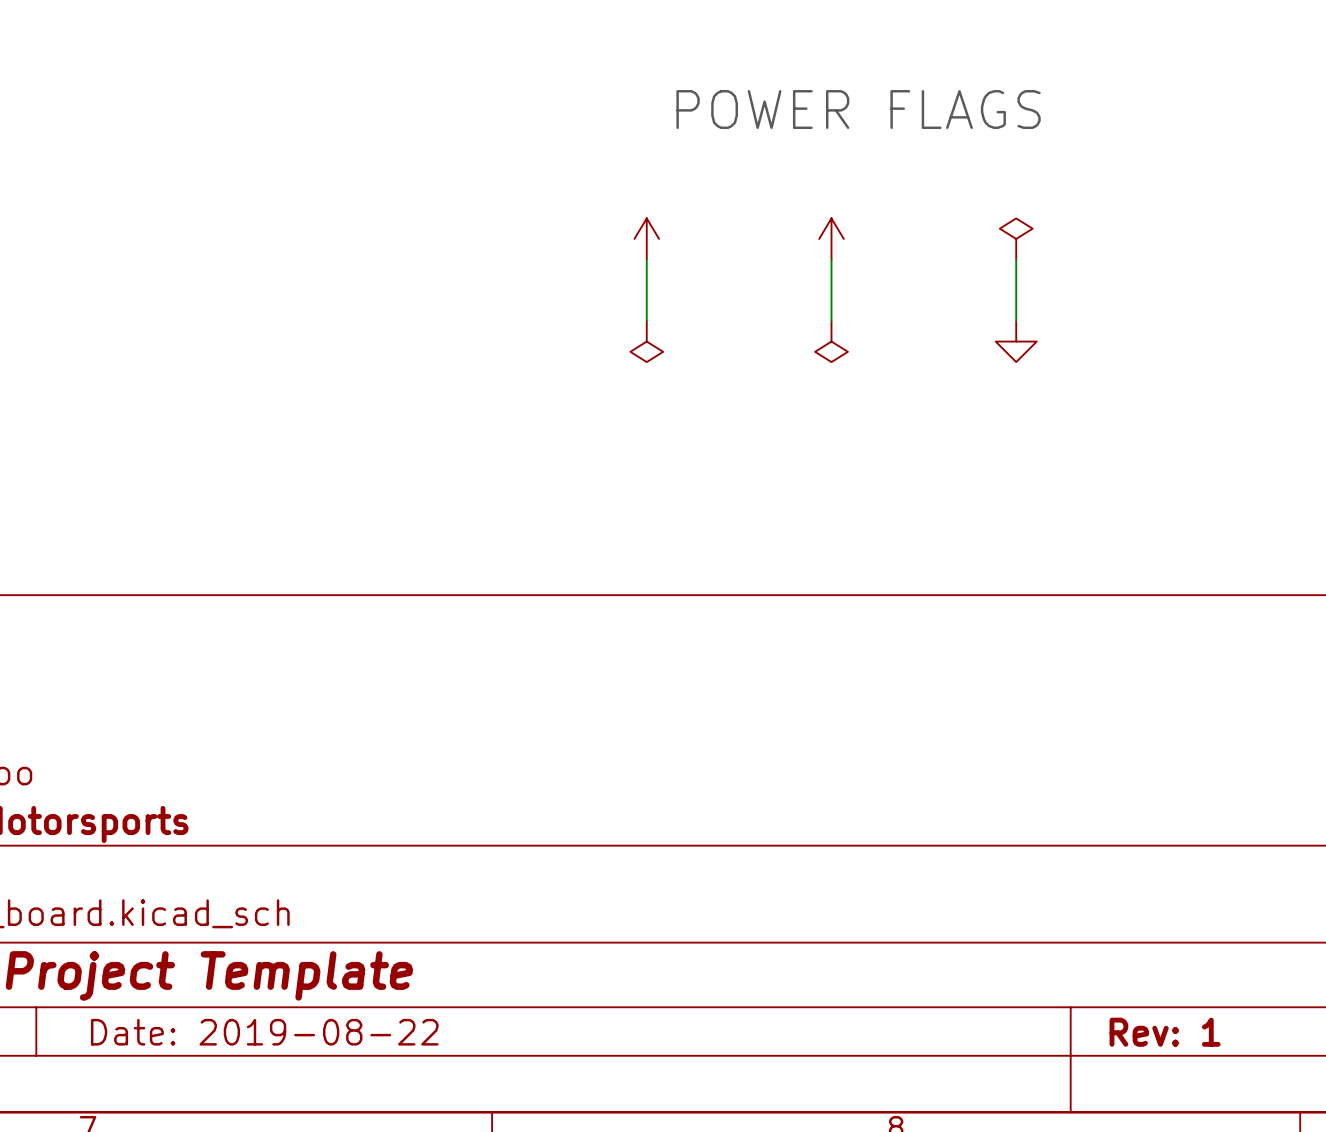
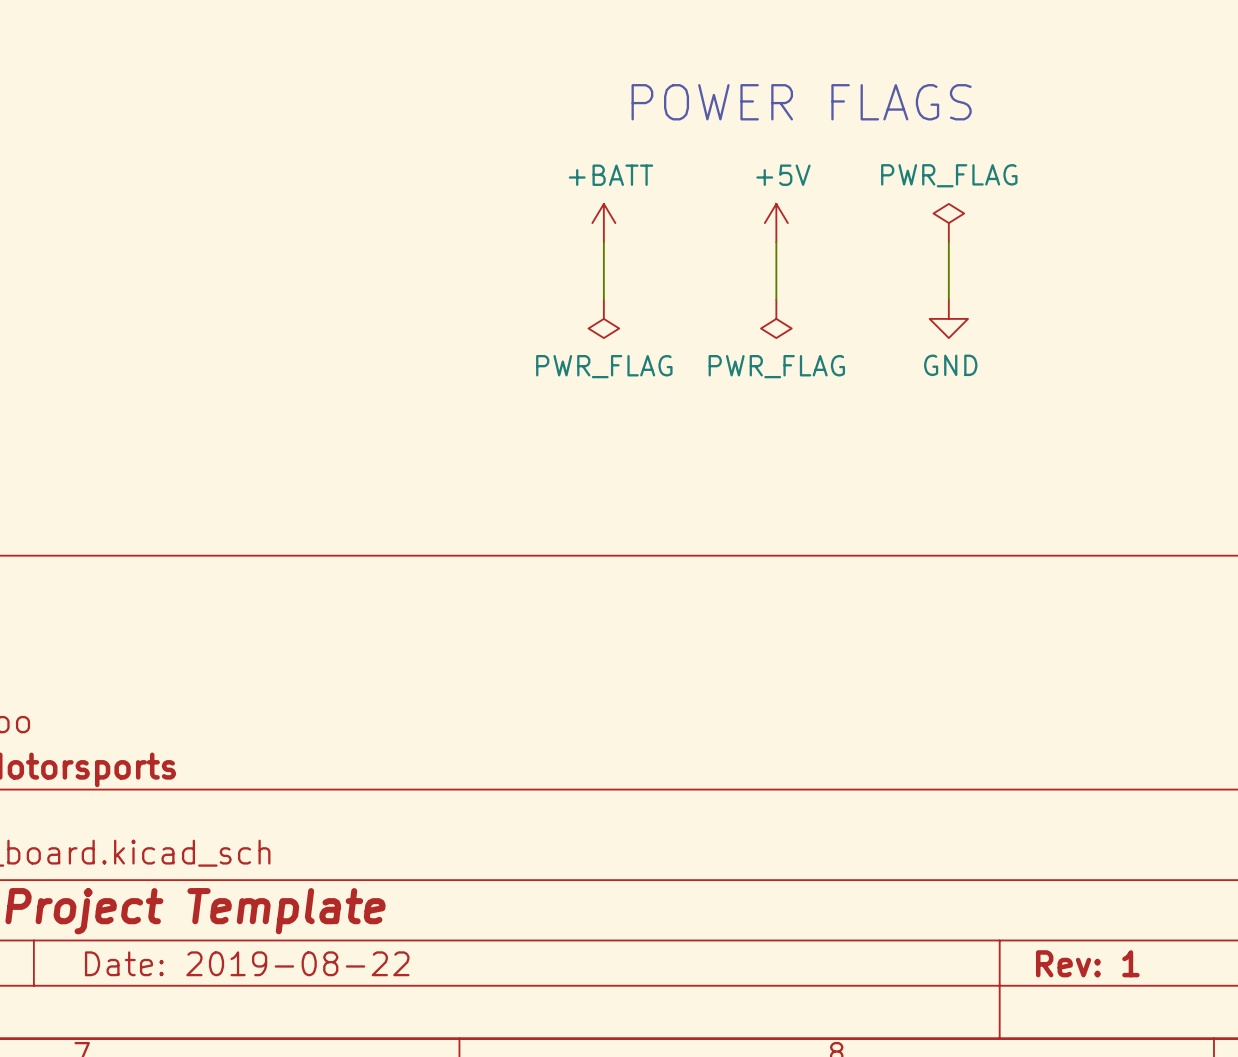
power symbol text: none -> +BATT (610, 175)
power symbol text: none -> +5V (783, 175)
power symbol text: none -> PWR_FLAG (949, 175)
power symbol text: none -> GND (950, 365)
power symbol text: none -> PWR_FLAG (604, 366)
power symbol text: none -> PWR_FLAG (776, 366)

